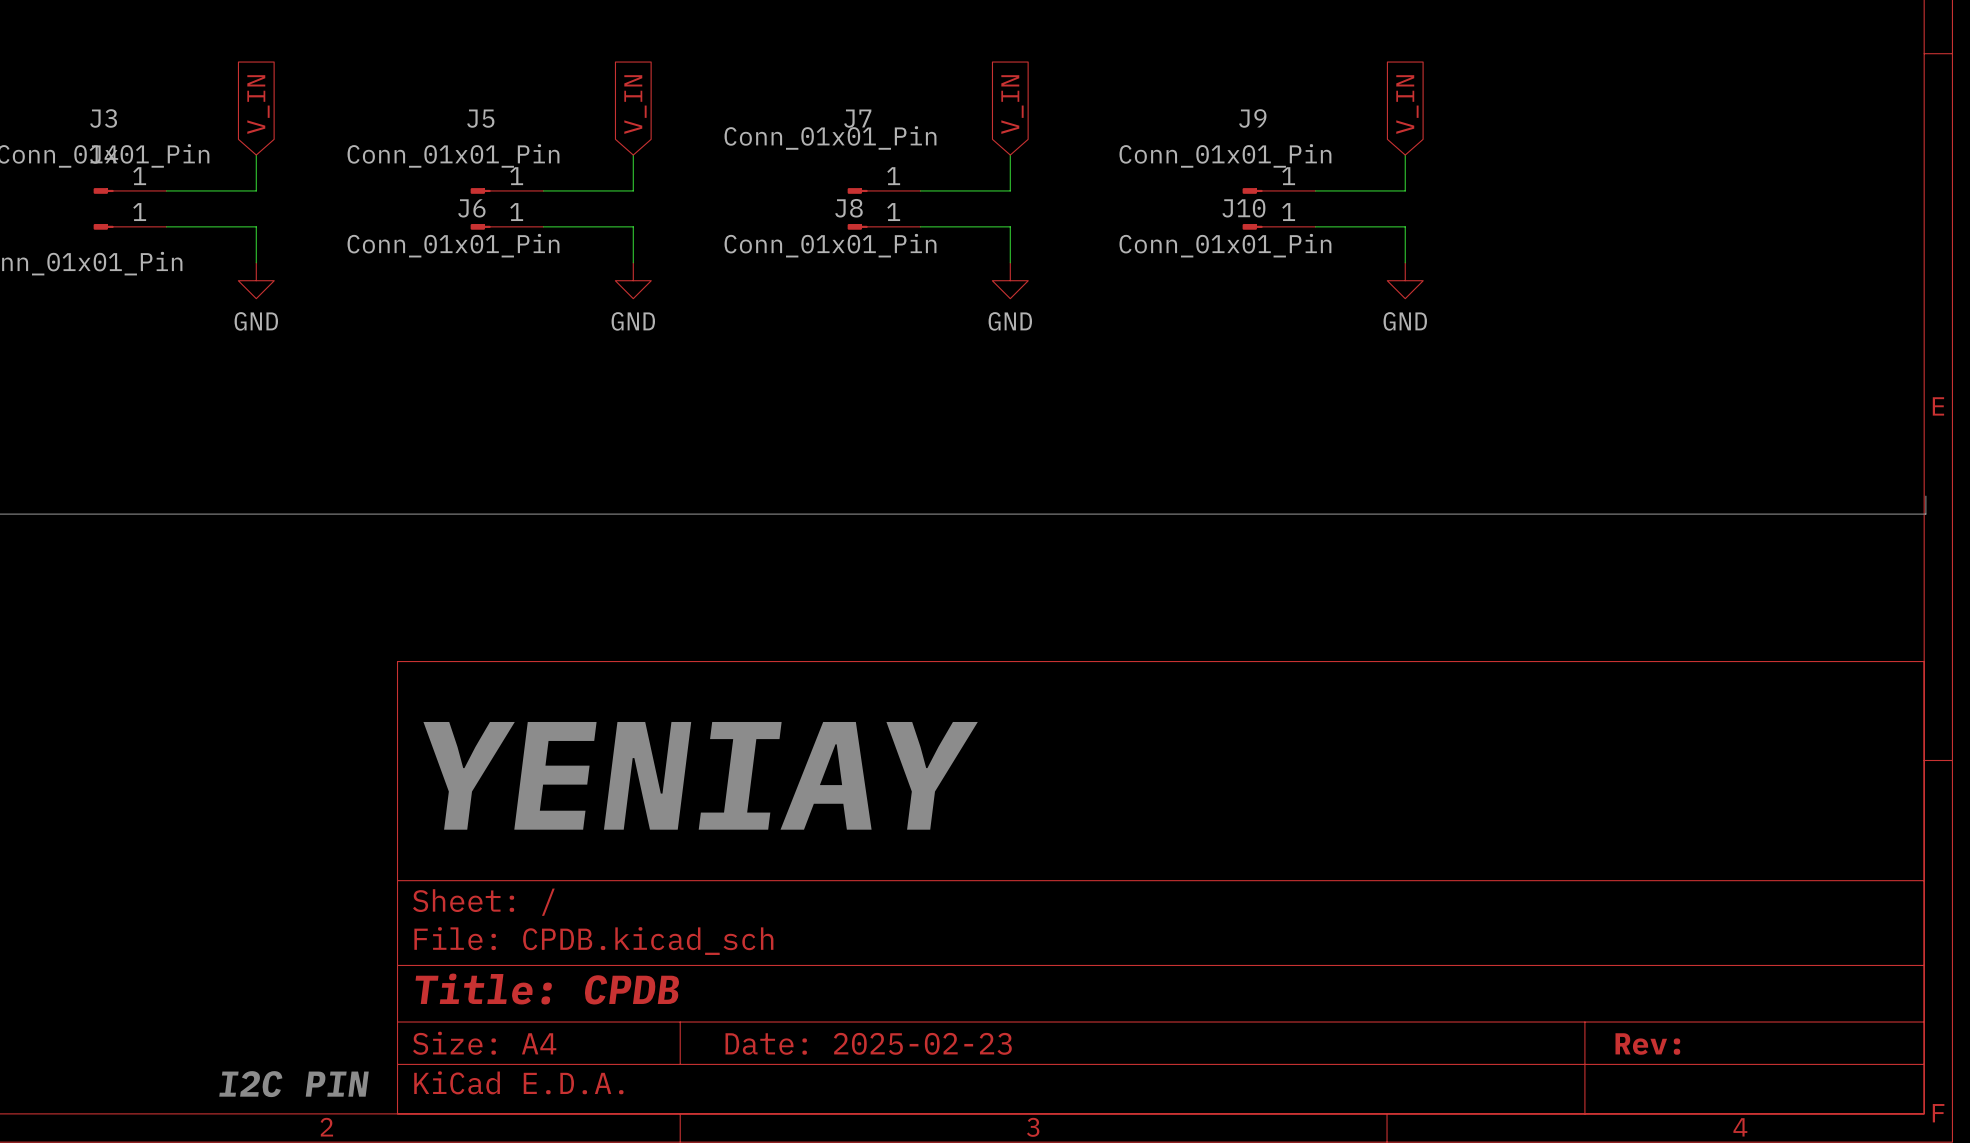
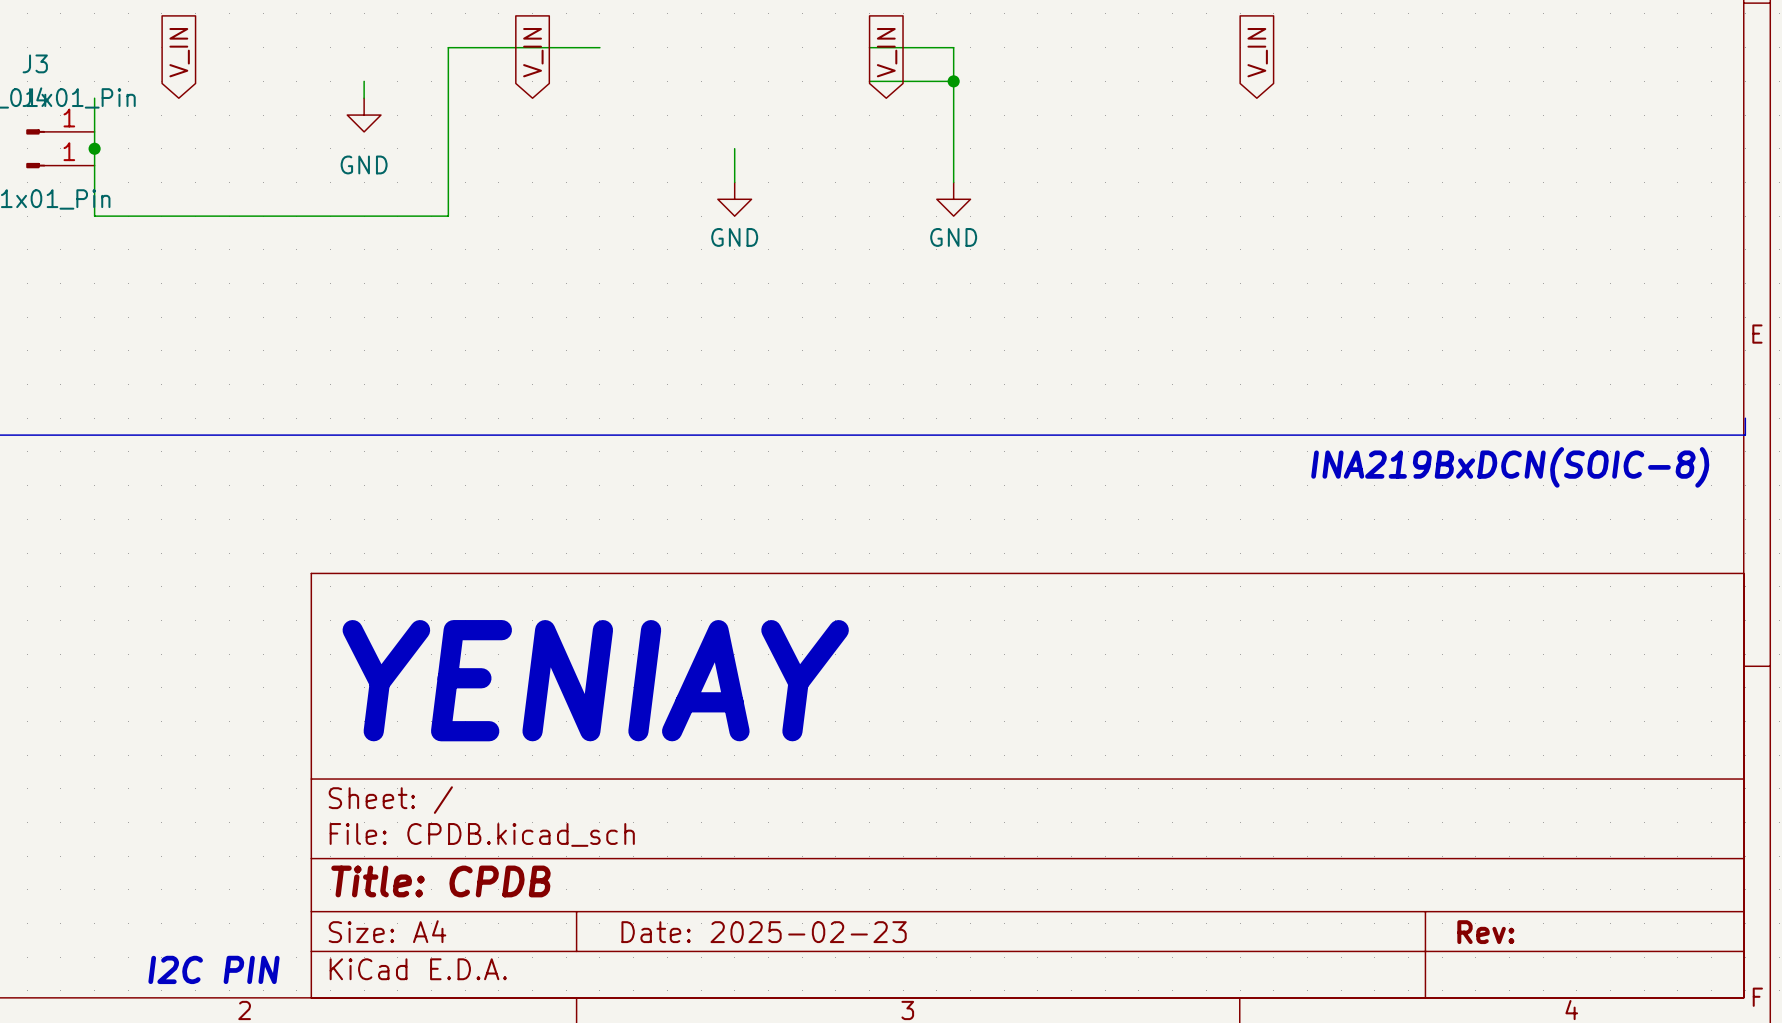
wire: none -> (599, 47) (448, 47) (448, 216) (94, 216) (94, 98)
wire: none -> (869, 47) (953, 47) (953, 182)
wire: none -> (364, 81) (364, 98)
wire: none -> (869, 81) (953, 81)
junction: none -> (953, 81)
wire: (256, 155) (256, 190) (166, 190) -> none
wire: (633, 155) (633, 190) (543, 190) -> none
wire: (1010, 155) (1010, 190) (920, 190) -> none
wire: (1405, 155) (1405, 190) (1315, 190) -> none
power symbol: none -> GND (364, 115)
J5: Conn_01x01_Pin (507, 190) -> none
J7: Conn_01x01_Pin (884, 190) -> none
J9: Conn_01x01_Pin (1279, 190) -> none
junction: none -> (94, 148)
wire: none -> (734, 148) (734, 182)
wire: (166, 226) (256, 226) (256, 262) -> none
J6: Conn_01x01_Pin (507, 226) -> none
wire: (543, 226) (633, 226) (633, 262) -> none
J8: Conn_01x01_Pin (884, 226) -> none
wire: (920, 226) (1010, 226) (1010, 262) -> none
J10: Conn_01x01_Pin (1279, 226) -> none
wire: (1315, 226) (1405, 226) (1405, 262) -> none
power symbol: none -> GND (734, 199)
power symbol: GND (256, 280) -> none
power symbol: GND (633, 280) -> none
power symbol position: GND (1010, 280) -> GND (953, 199)
power symbol: GND (1405, 280) -> none
text: none -> INA219BxDCN(SOIC-8) (1510, 467)

